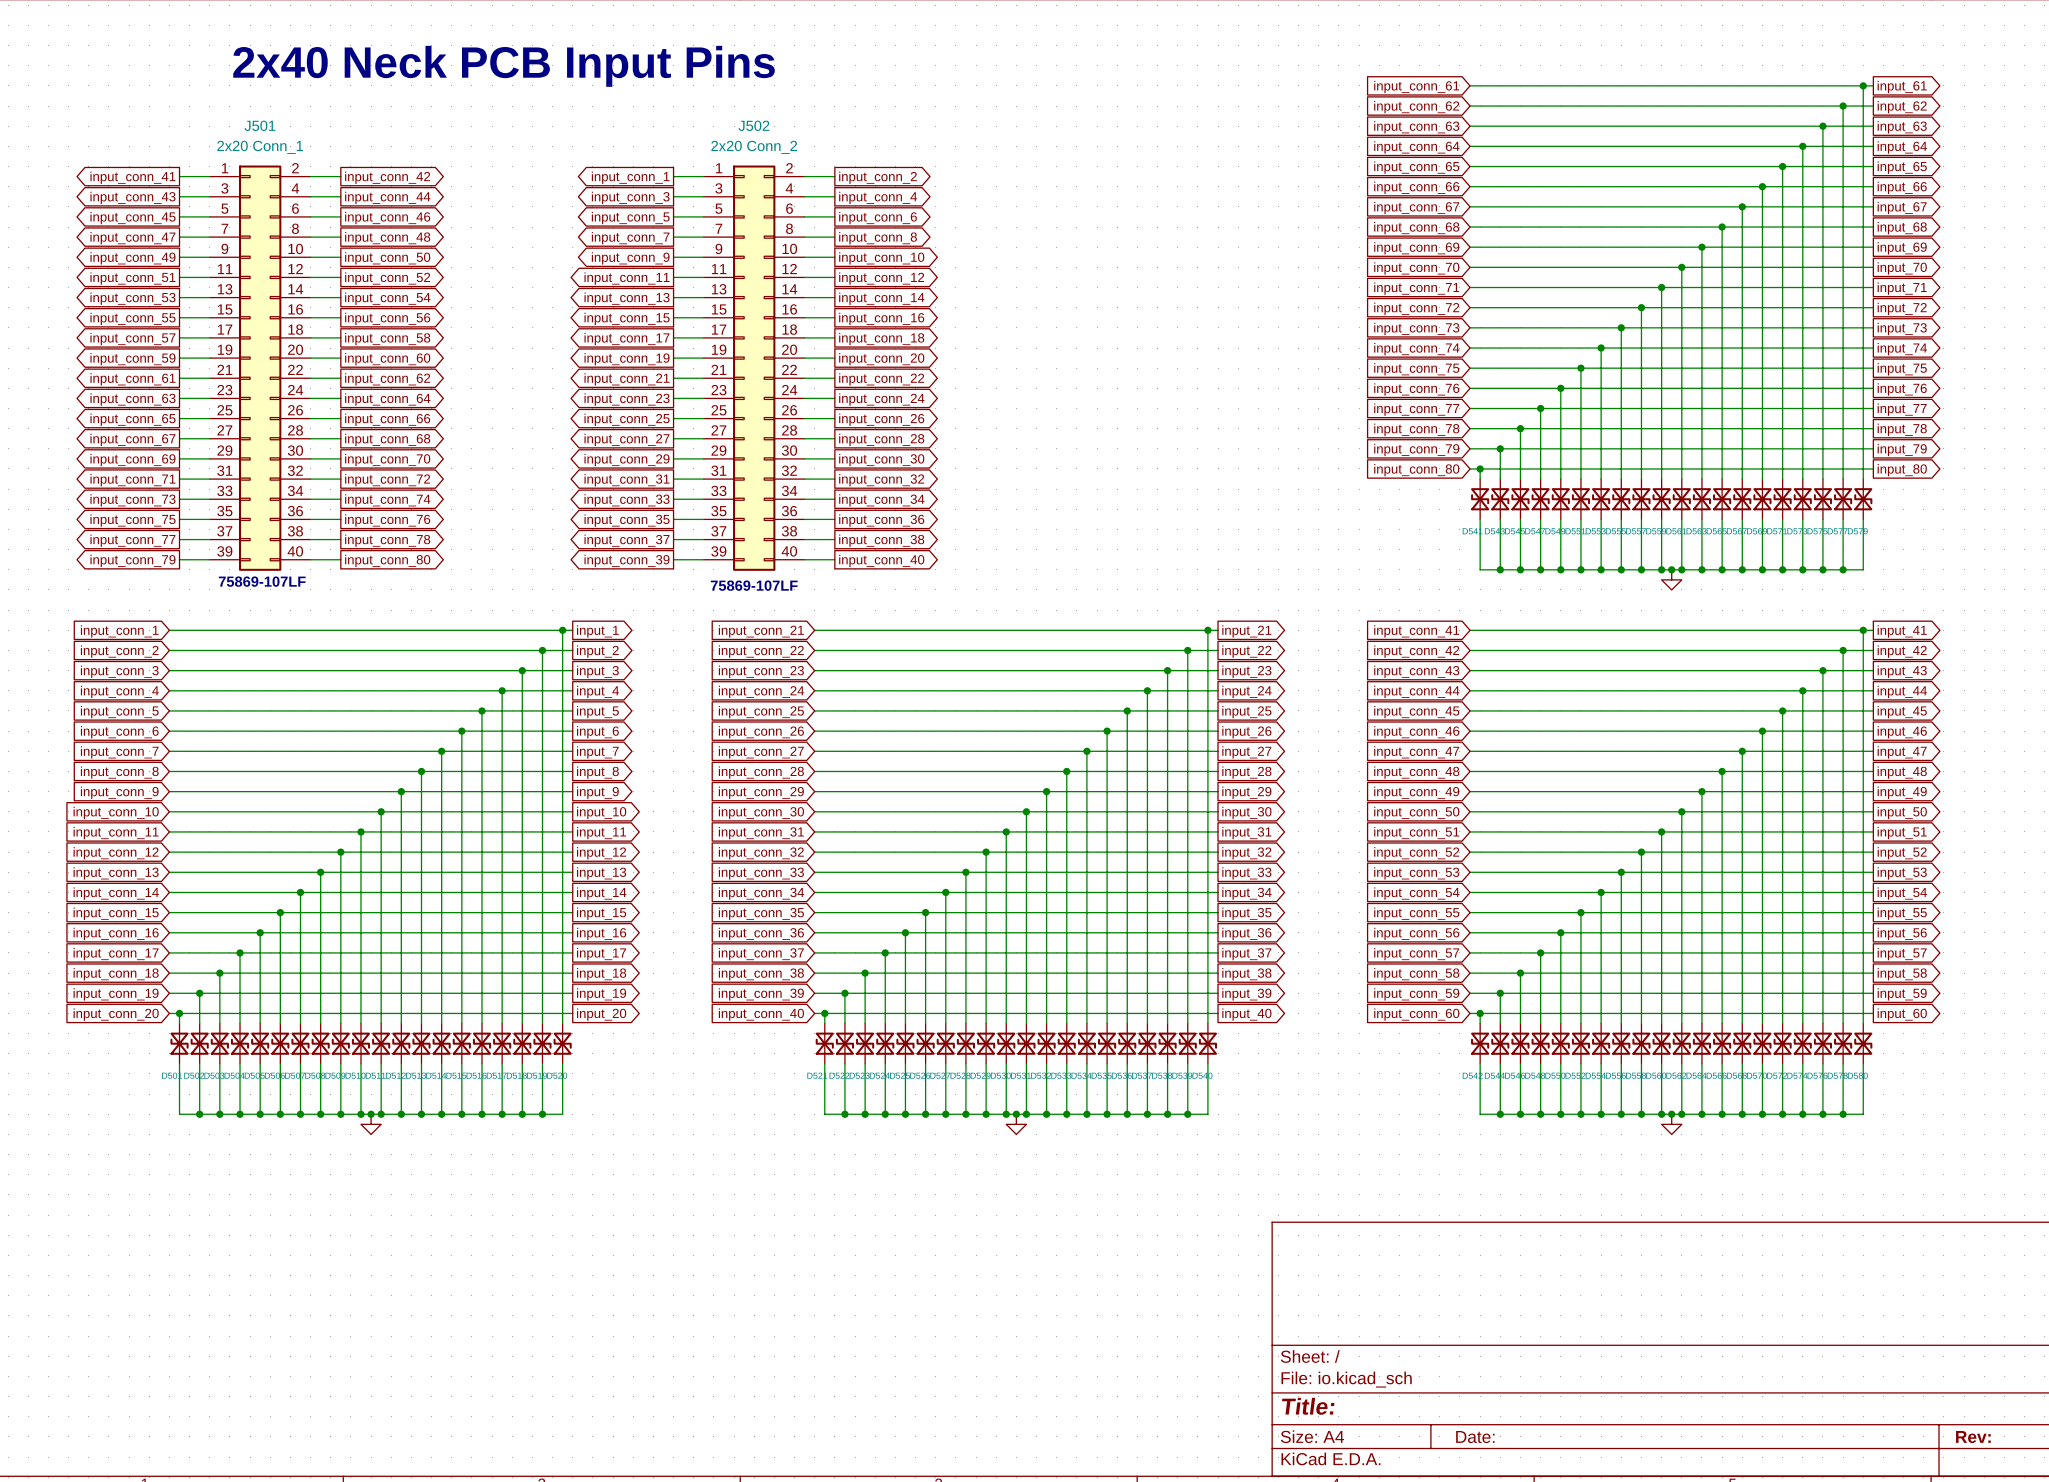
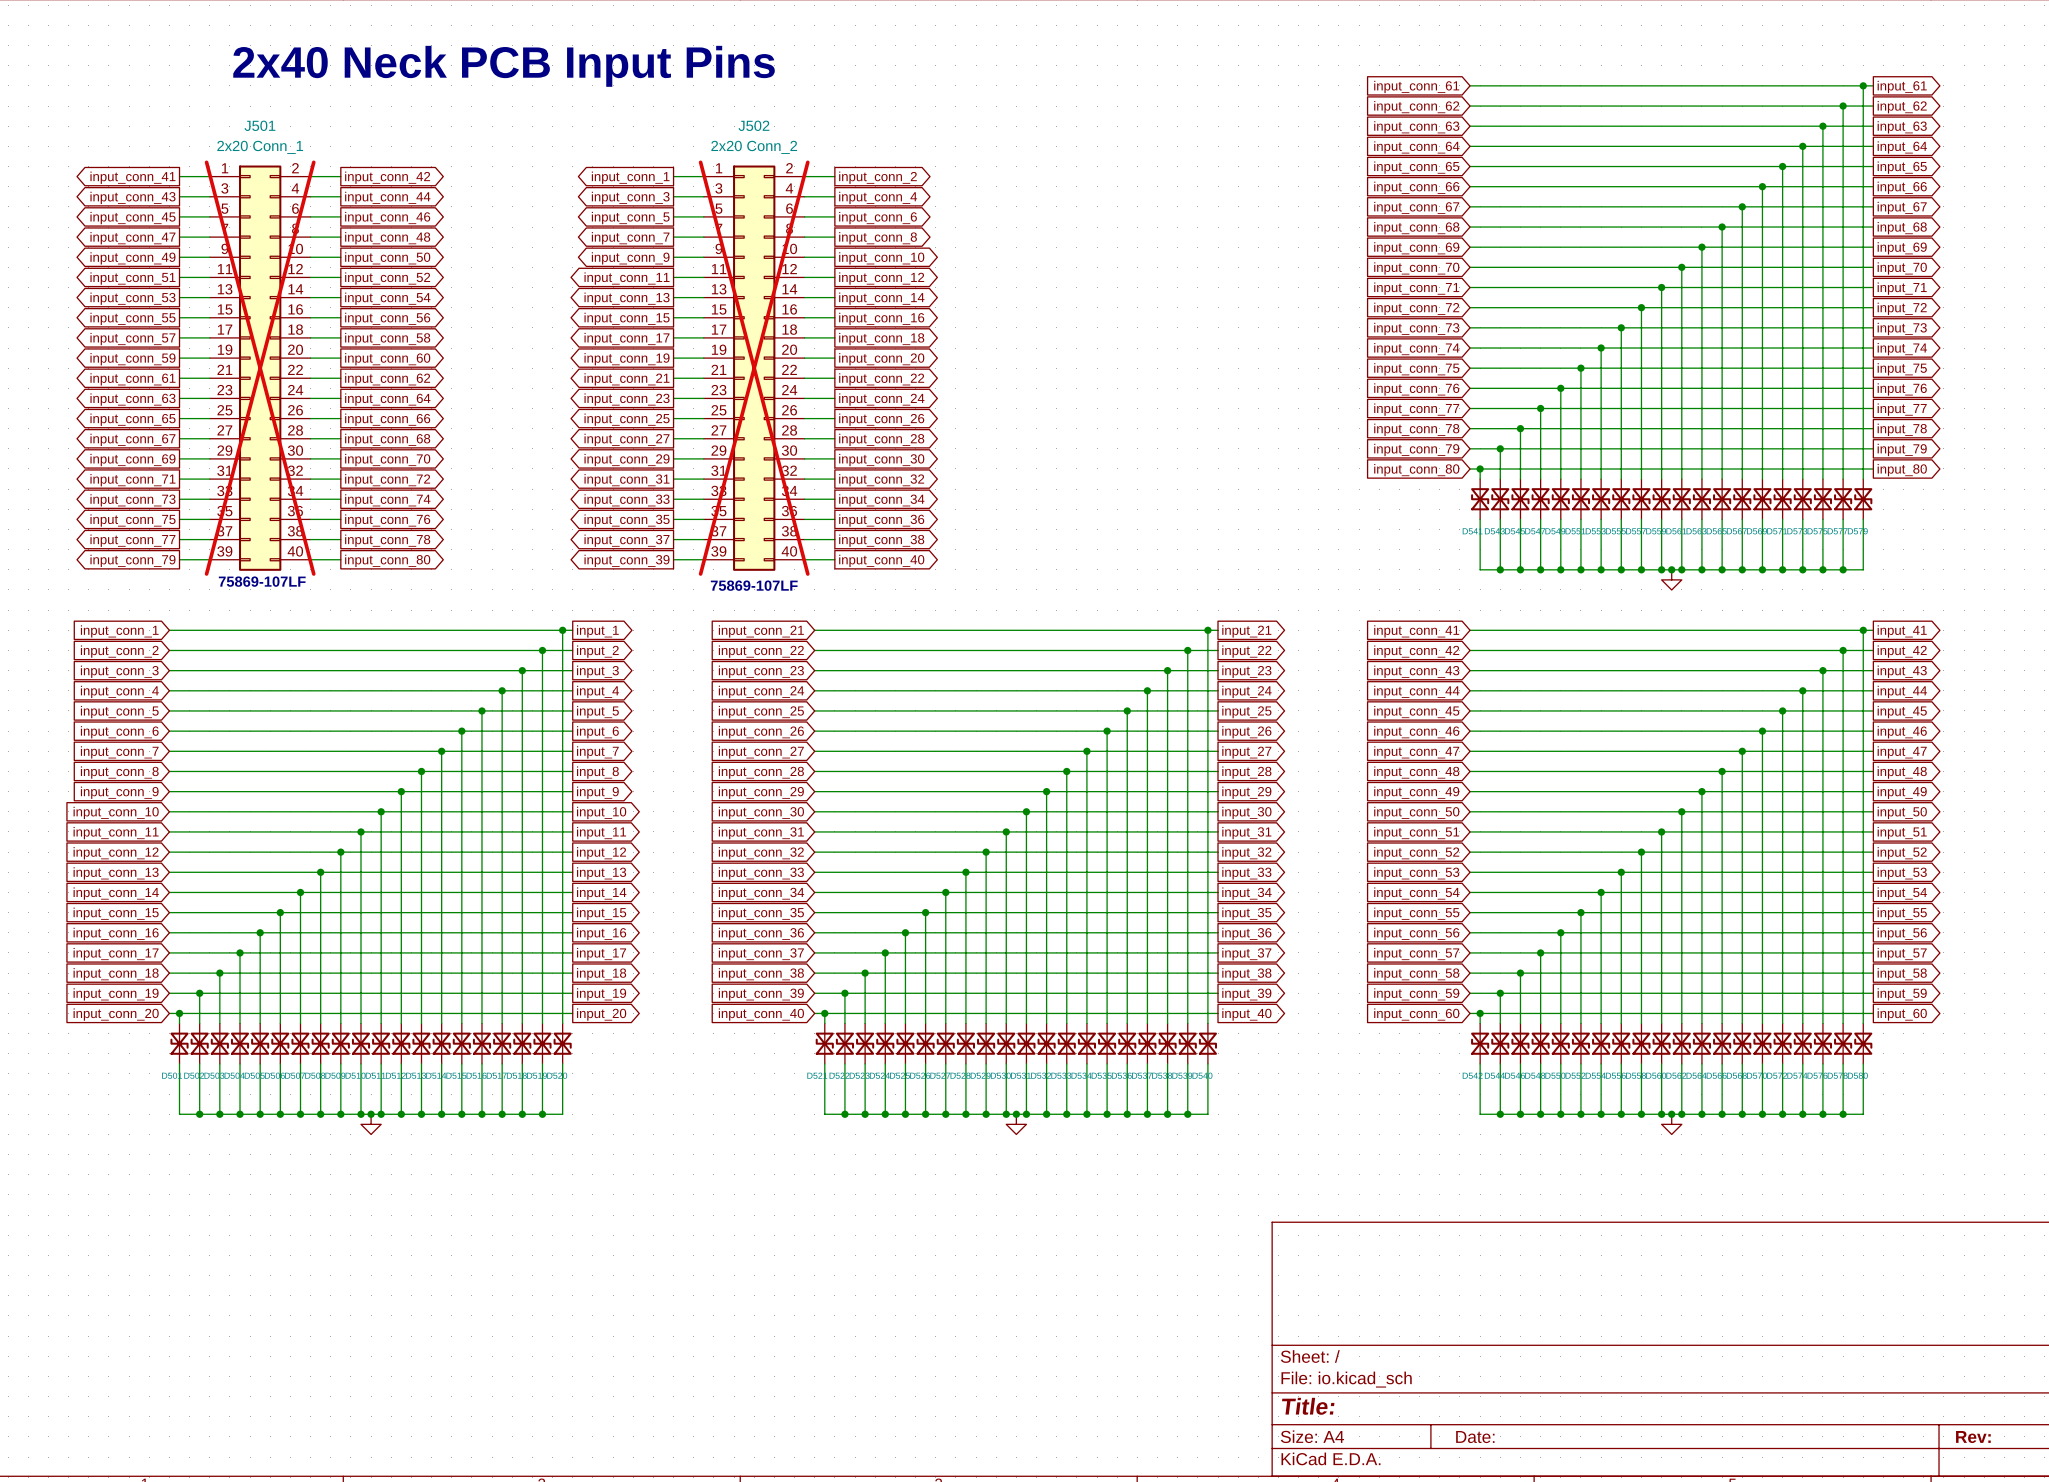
J501 do-not-place cross: none -> (260, 368)
J502 do-not-place cross: none -> (754, 368)

